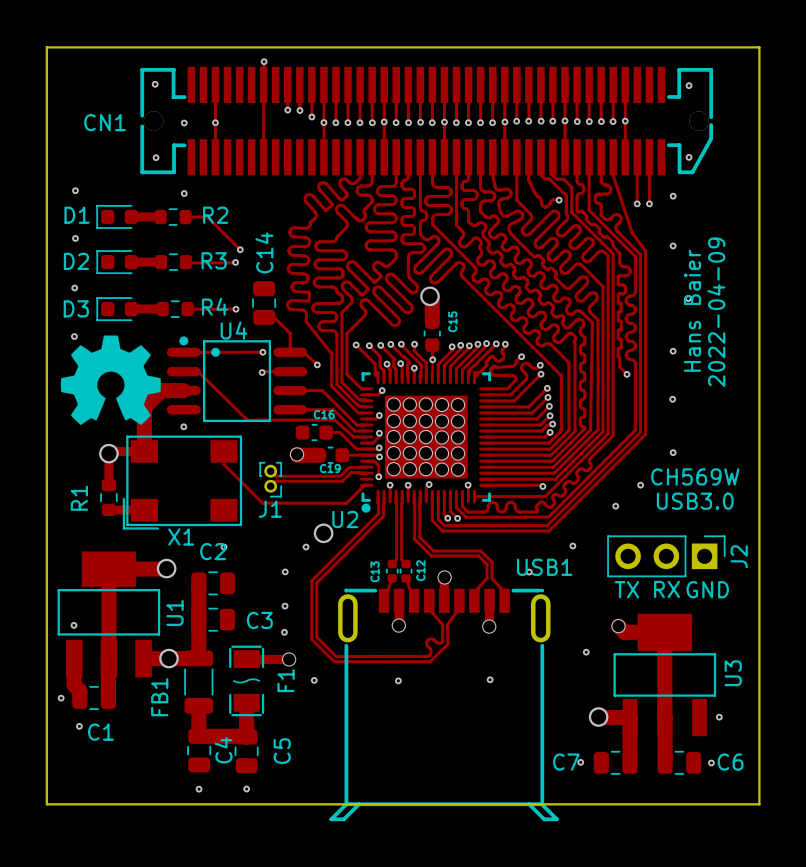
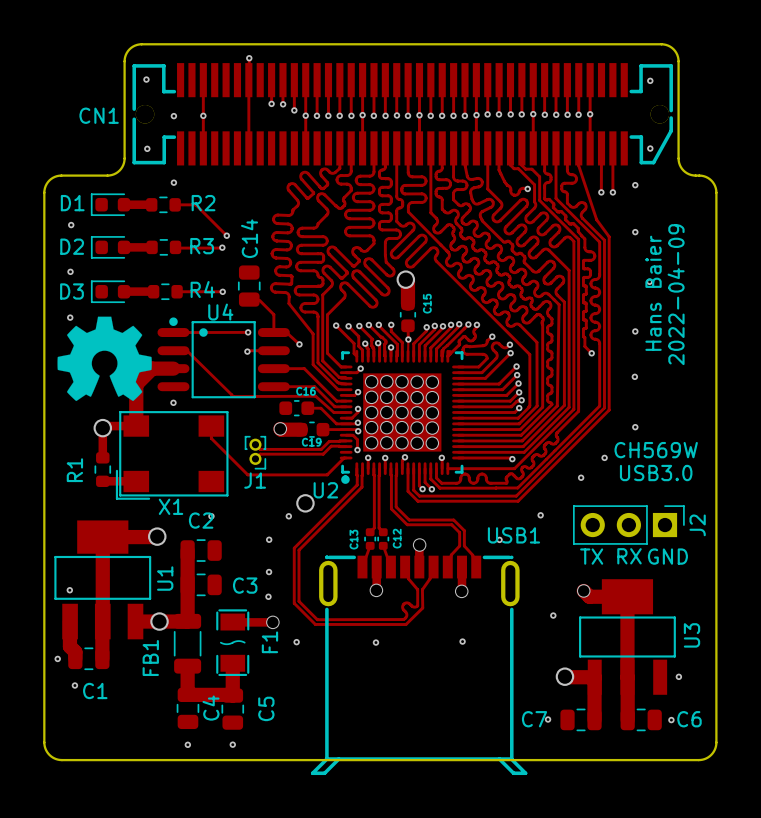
board edge: (46, 47) (759, 47) (759, 804) (46, 804) (46, 47) -> (141, 44) (131, 47) (124, 59) (124, 158) (122, 167) (117, 172) (109, 175) (56, 176) (49, 180) (44, 190) (44, 742) (48, 753) (54, 758) (61, 760) (698, 760) (709, 756) (714, 750) (716, 742) (716, 192) (714, 184) (709, 179) (687, 173) (679, 162) (678, 61) (675, 50) (670, 46) (661, 44) (141, 44)
via: (75, 190) -> none

